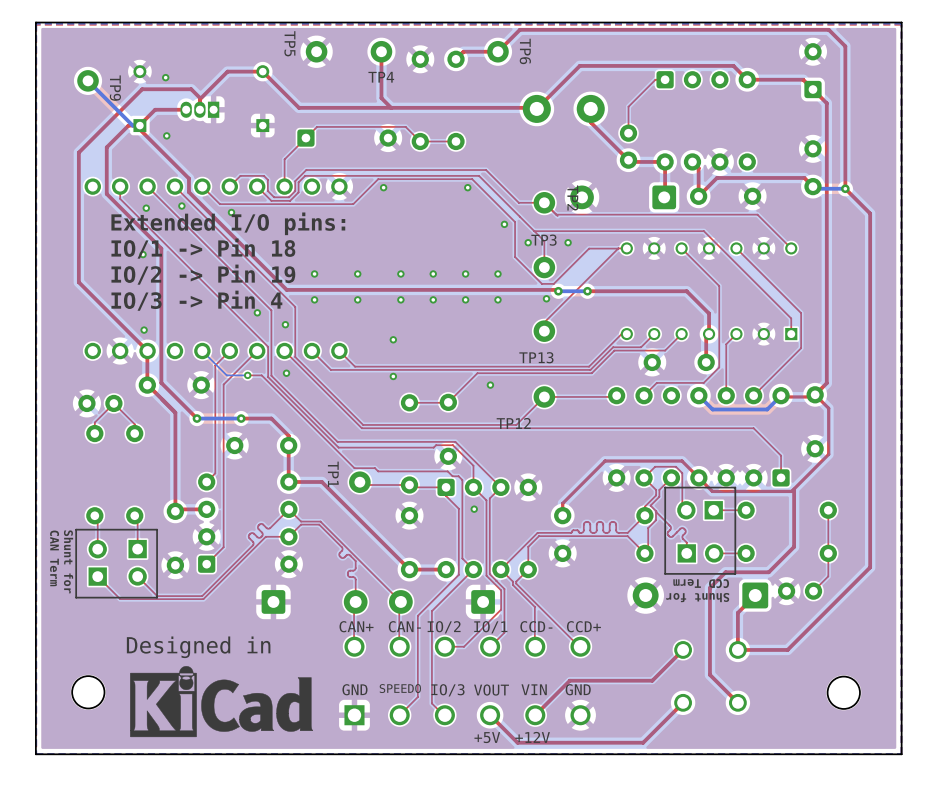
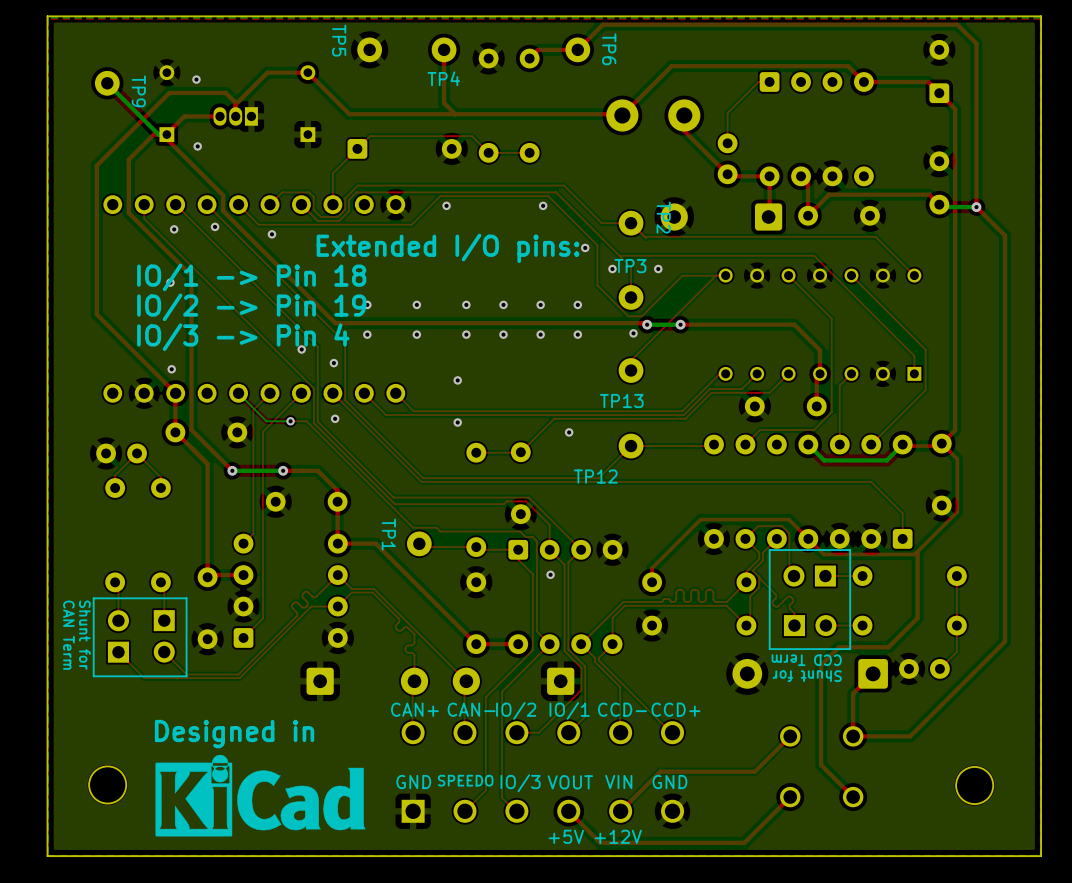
text position: Extended I/O pins: (228, 223) -> Extended I/O pins: (448, 248)

